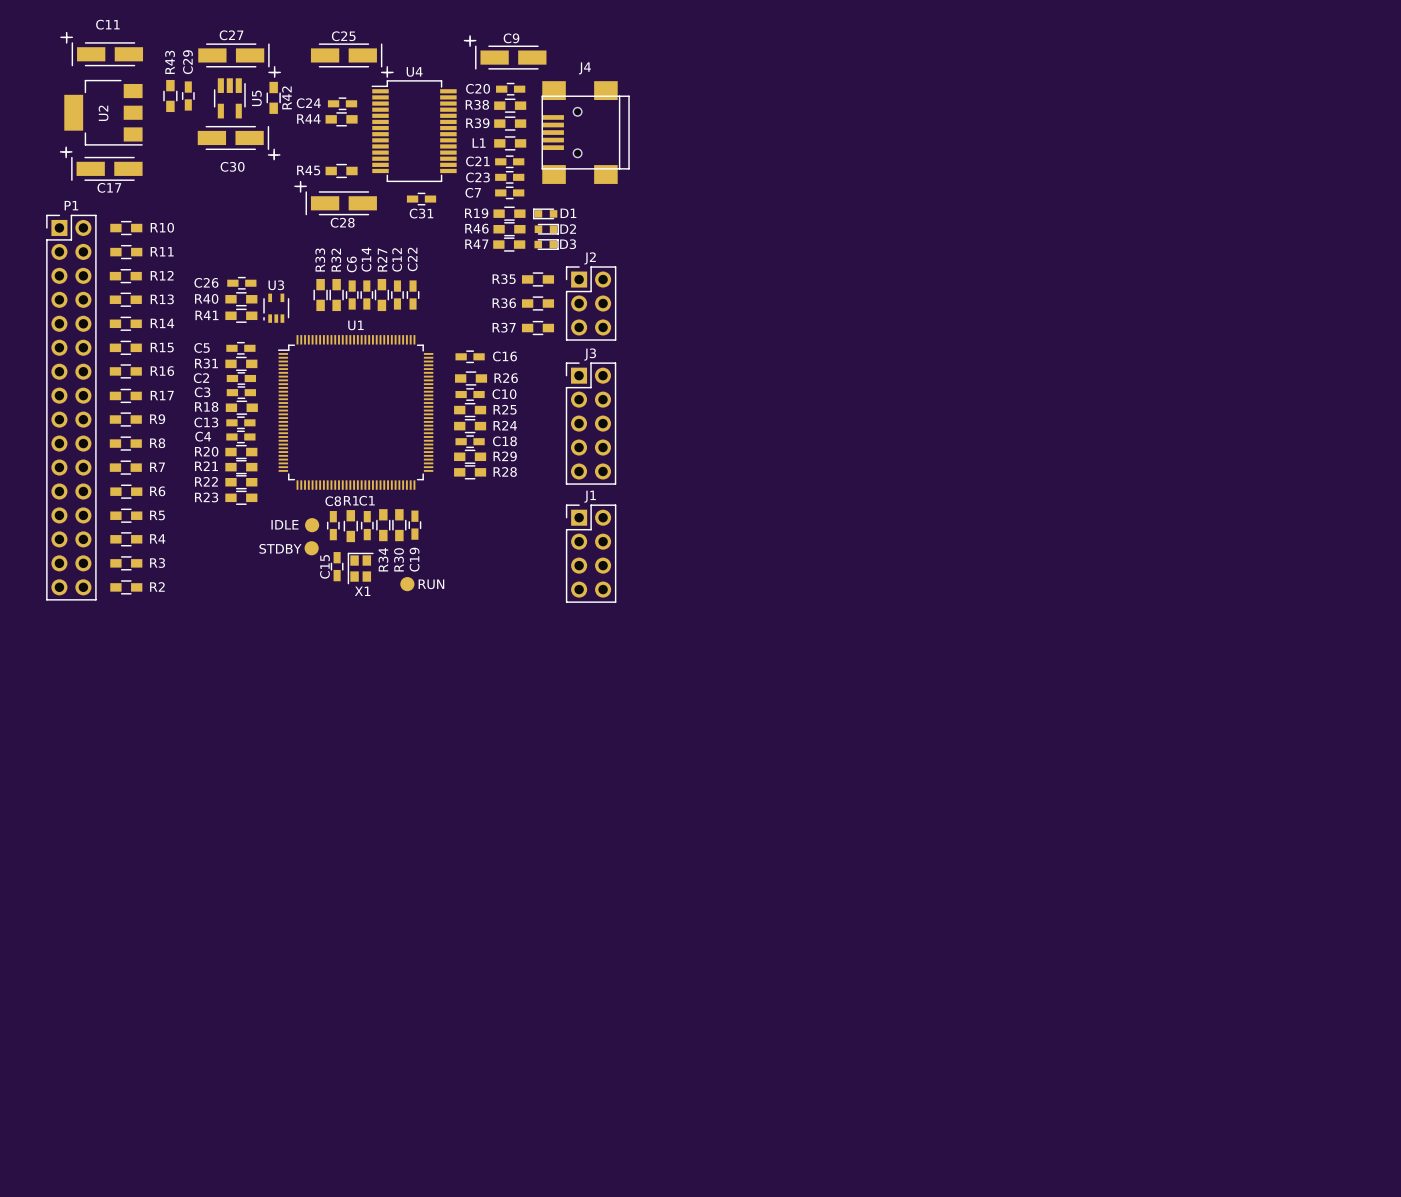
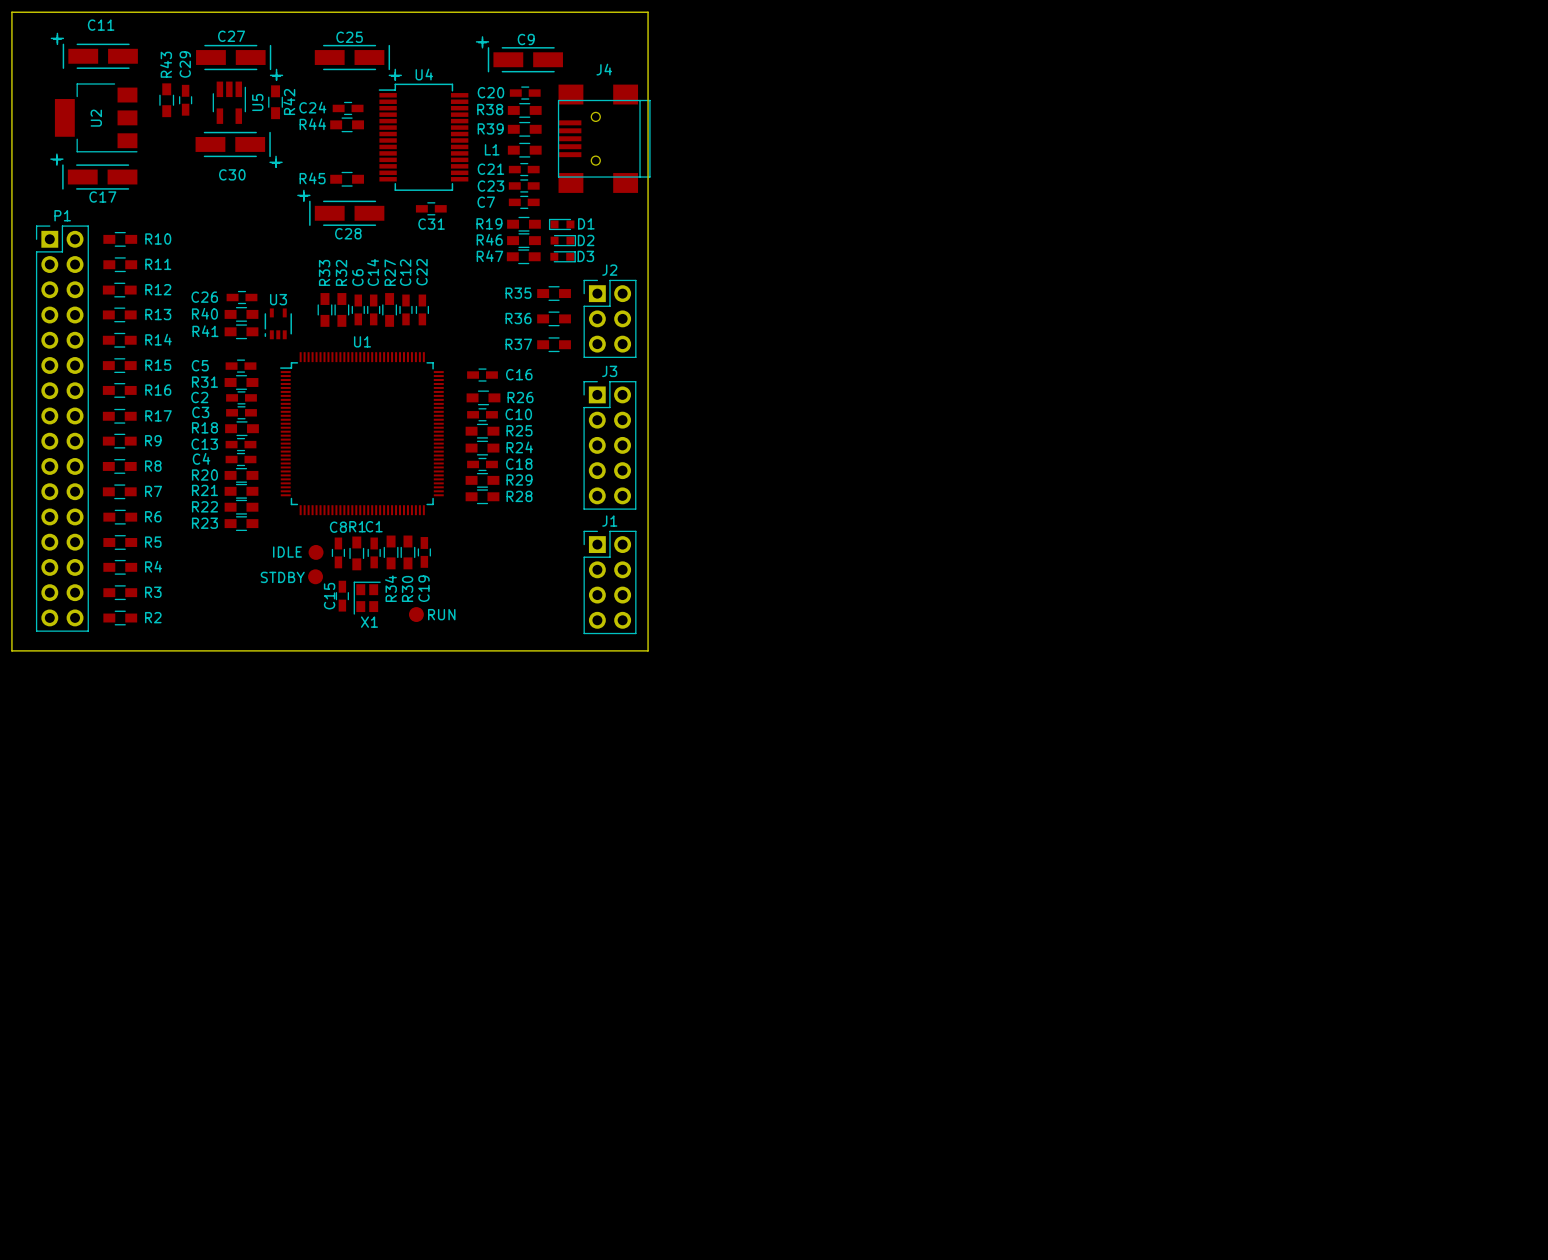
board edge: none -> (11, 12) (648, 12) (648, 650) (11, 650) (11, 12)

